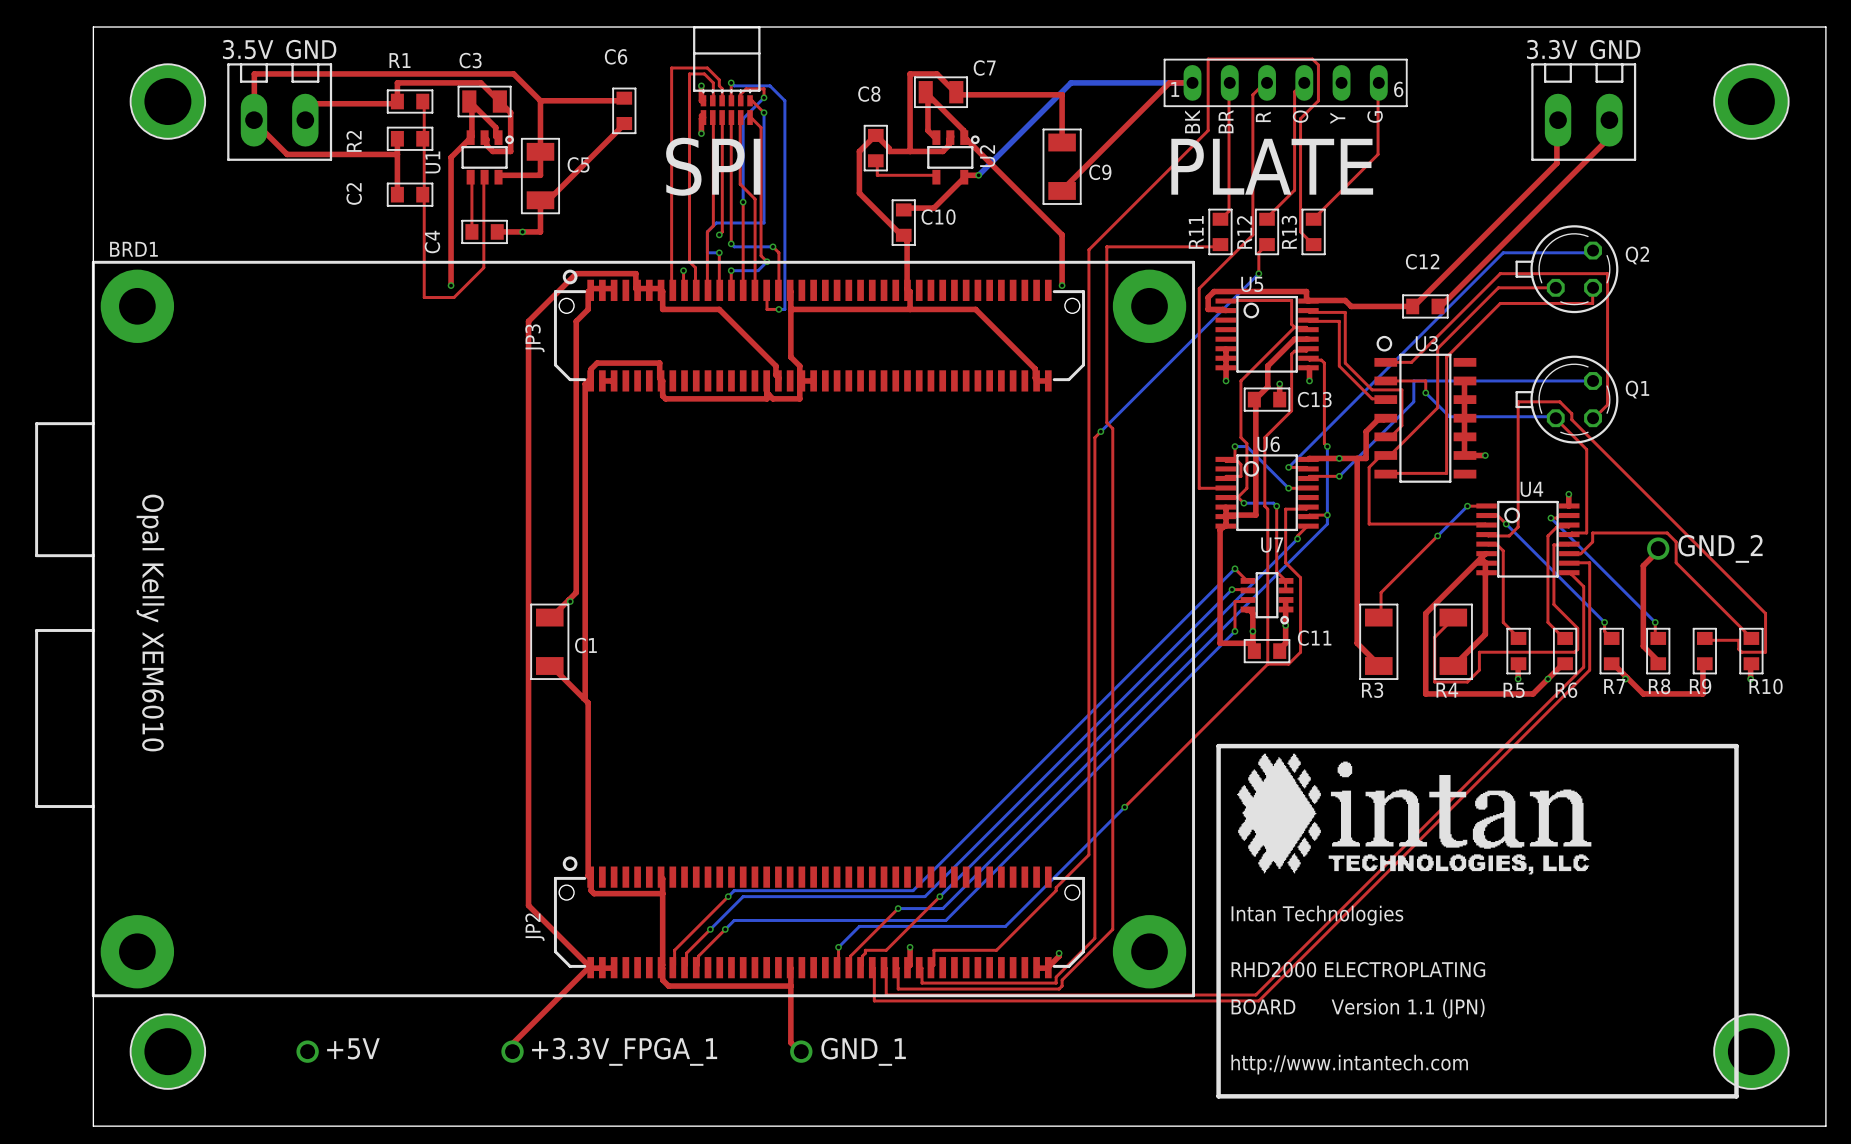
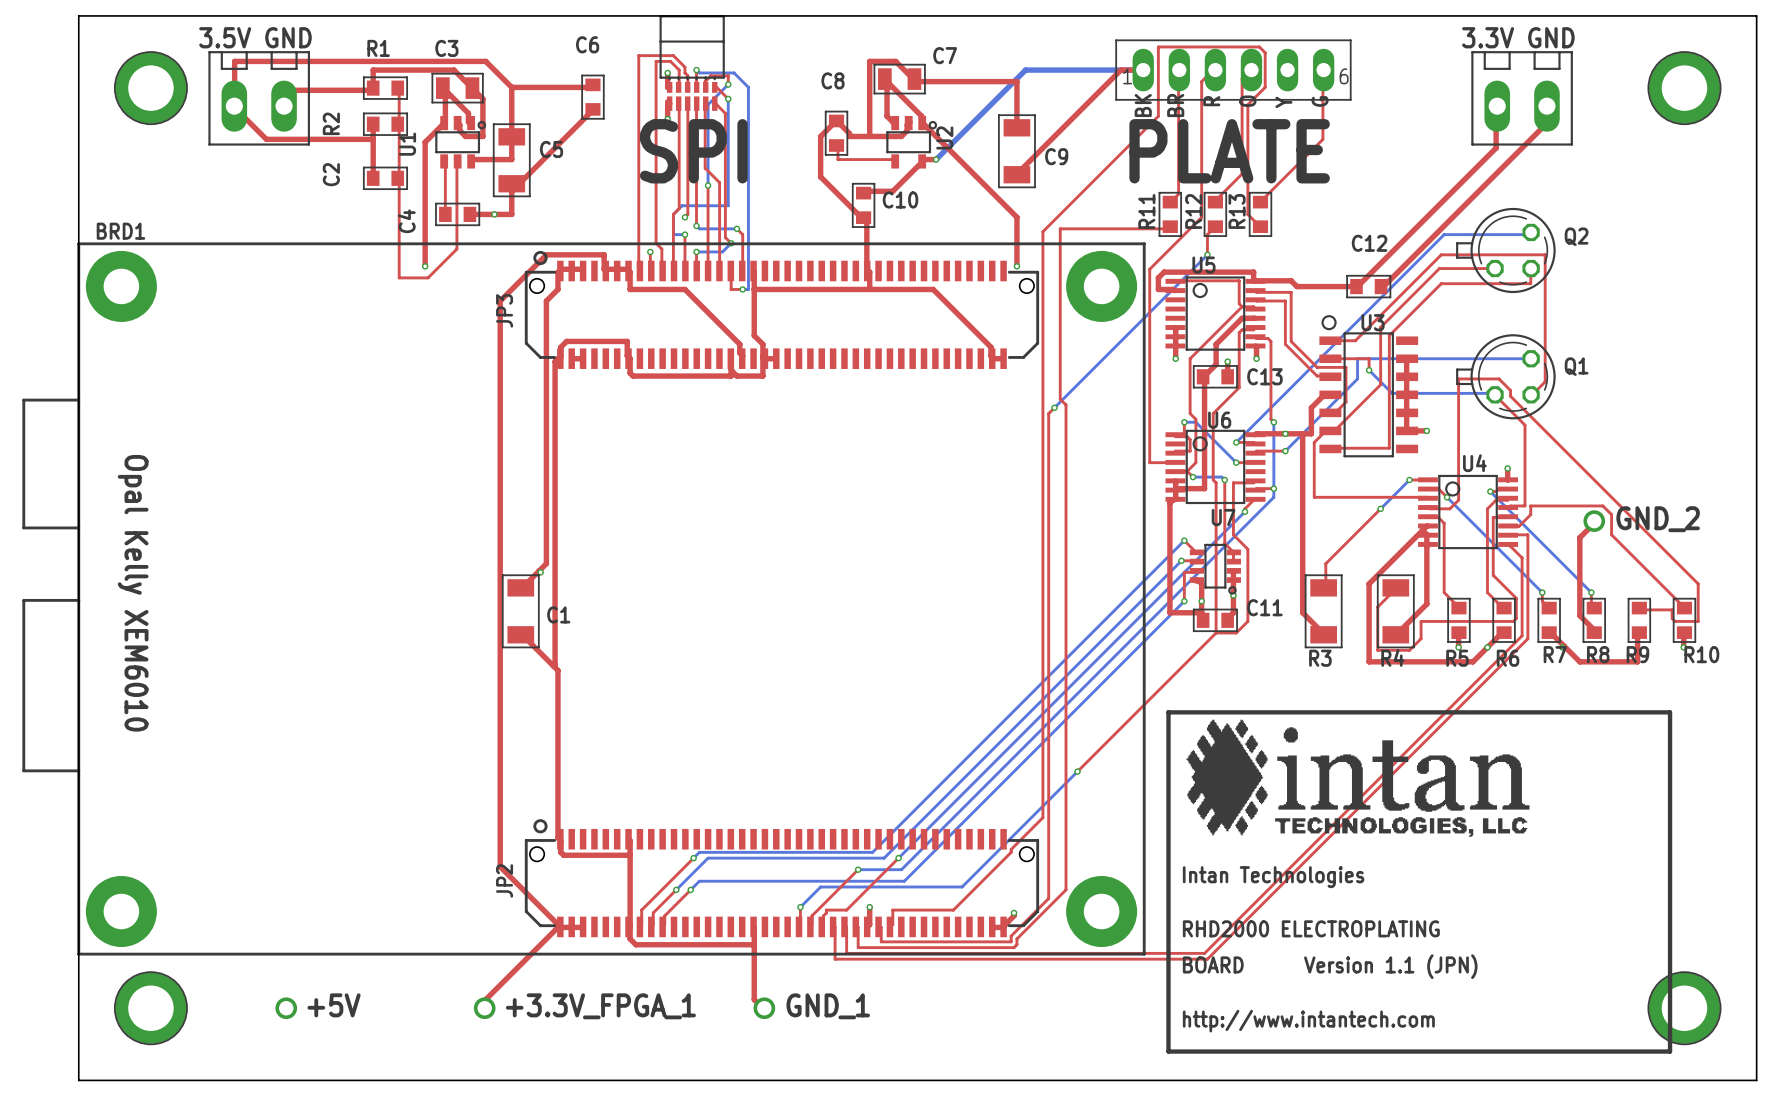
part footprint: [1163, 58, 1408, 108] -> [1115, 39, 1352, 101]

